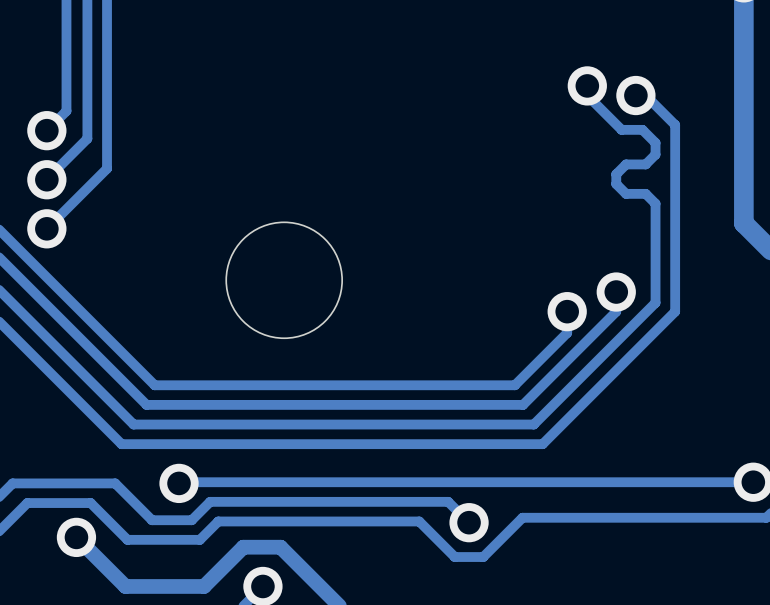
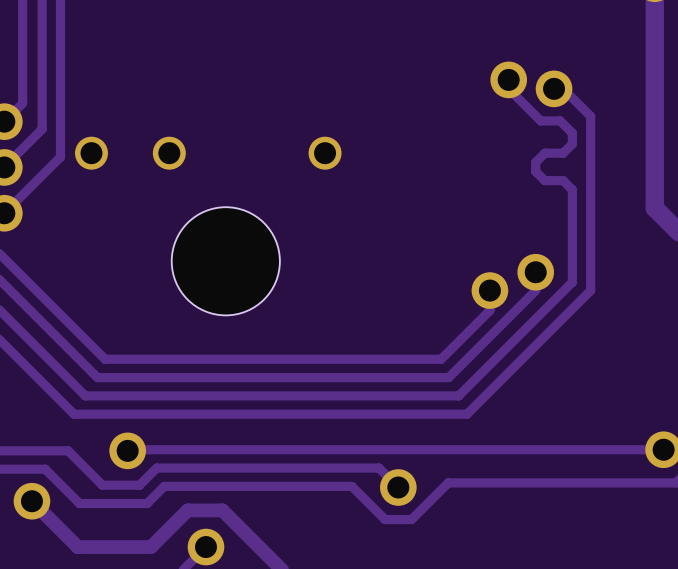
via: none -> (91, 153)
via: none -> (169, 153)
via: none -> (325, 153)

